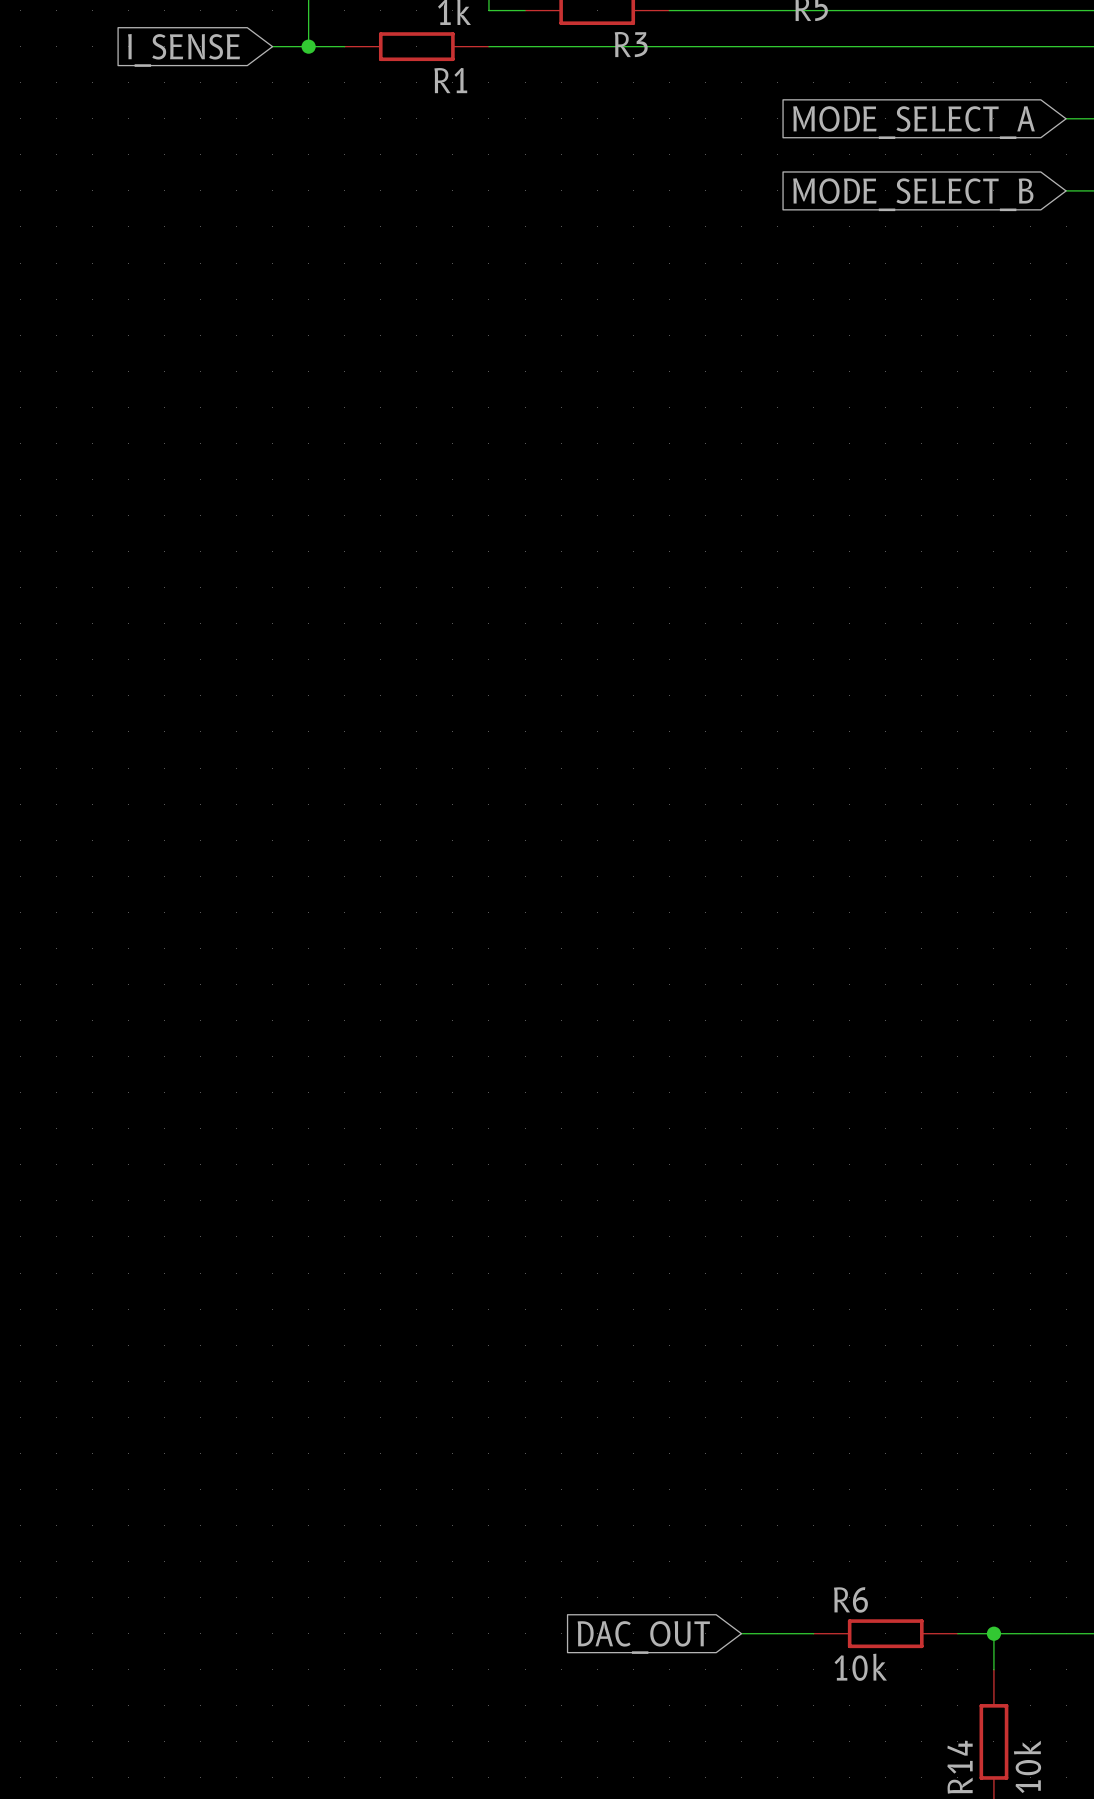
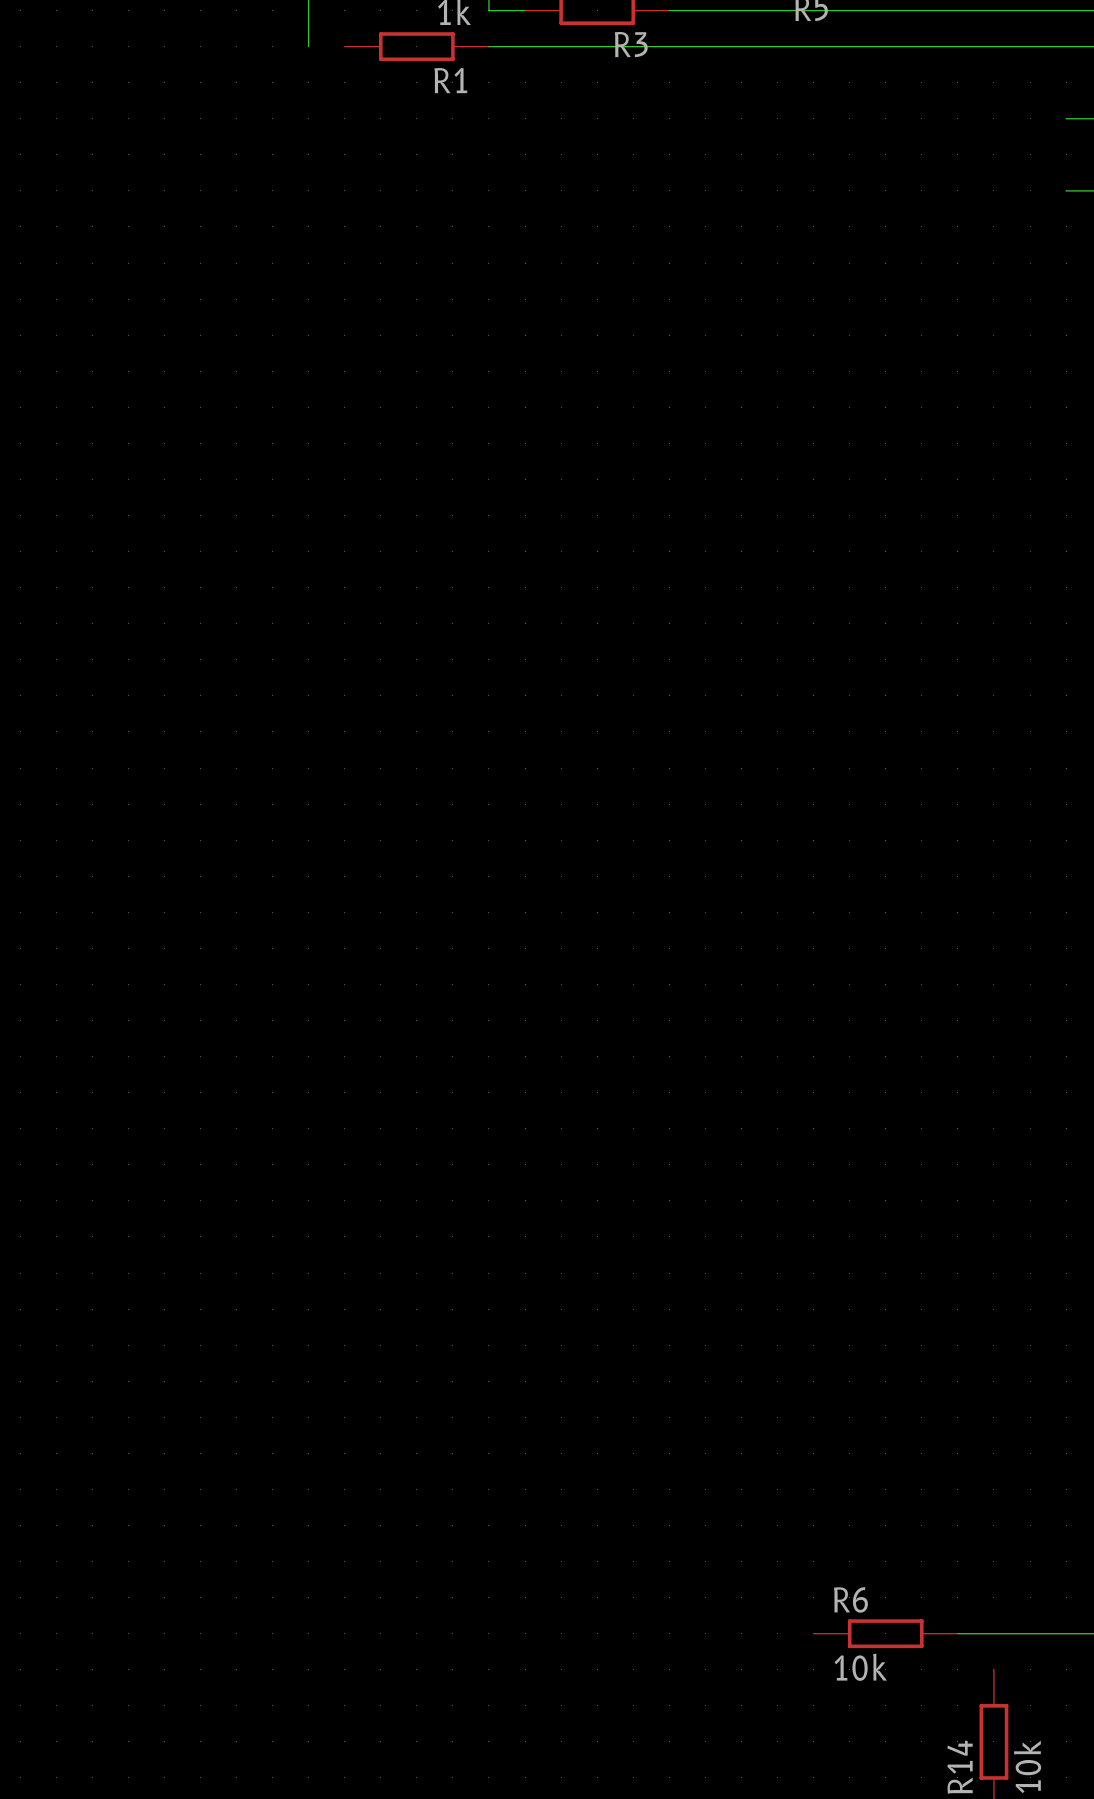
wire: (272, 46) (344, 46) -> none
junction: (308, 46) -> none
global label: I_SENSE (183, 50) -> none
global label: MODE_SELECT_A (914, 122) -> none
global label: MODE_SELECT_B (913, 194) -> none
wire: (741, 1633) (813, 1633) -> none
wire: (993, 1633) (993, 1669) -> none
junction: (993, 1633) -> none
global label: DAC_OUT (643, 1637) -> none

